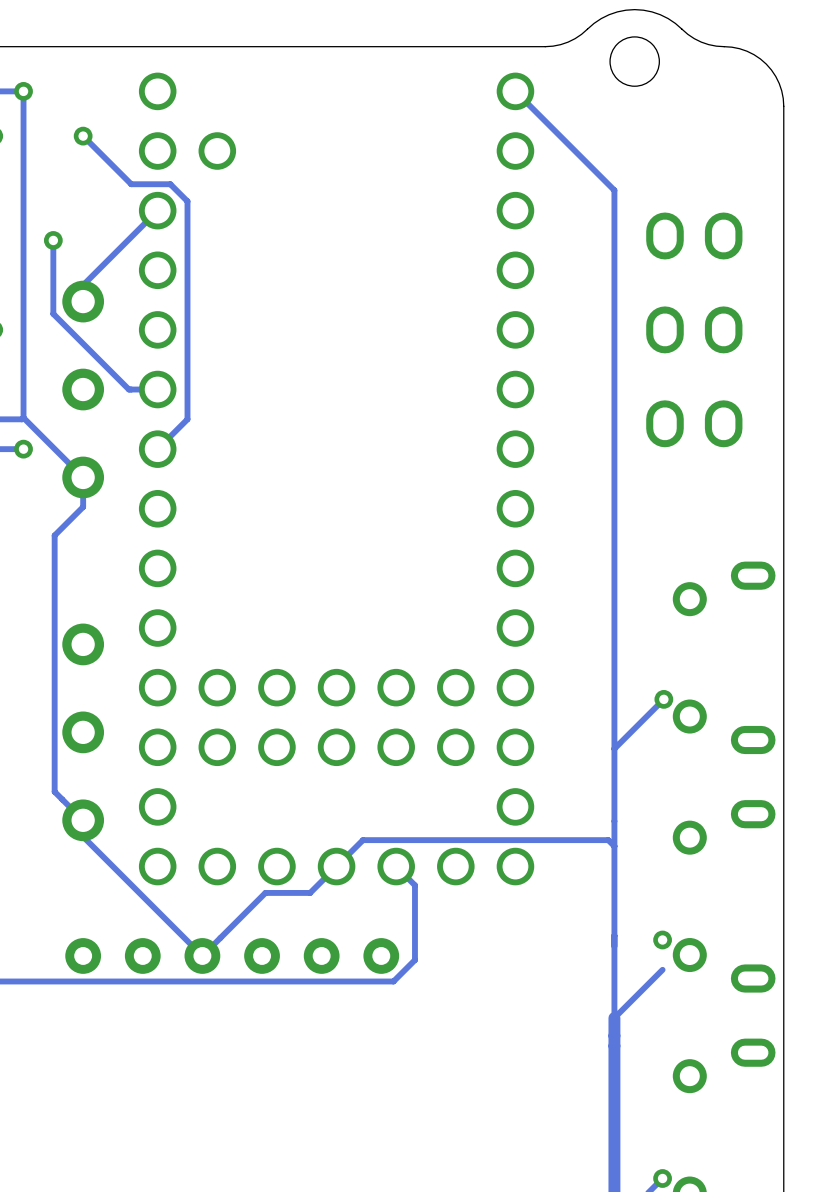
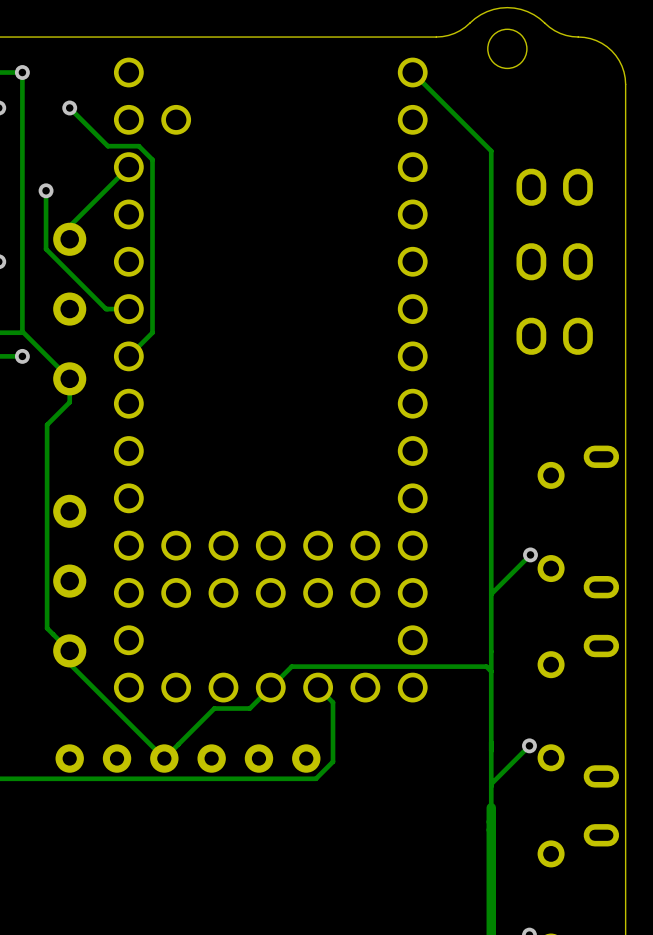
track: none -> (529, 745) (491, 784)
track: (662, 969) (614, 1017) (614, 1035) -> none

